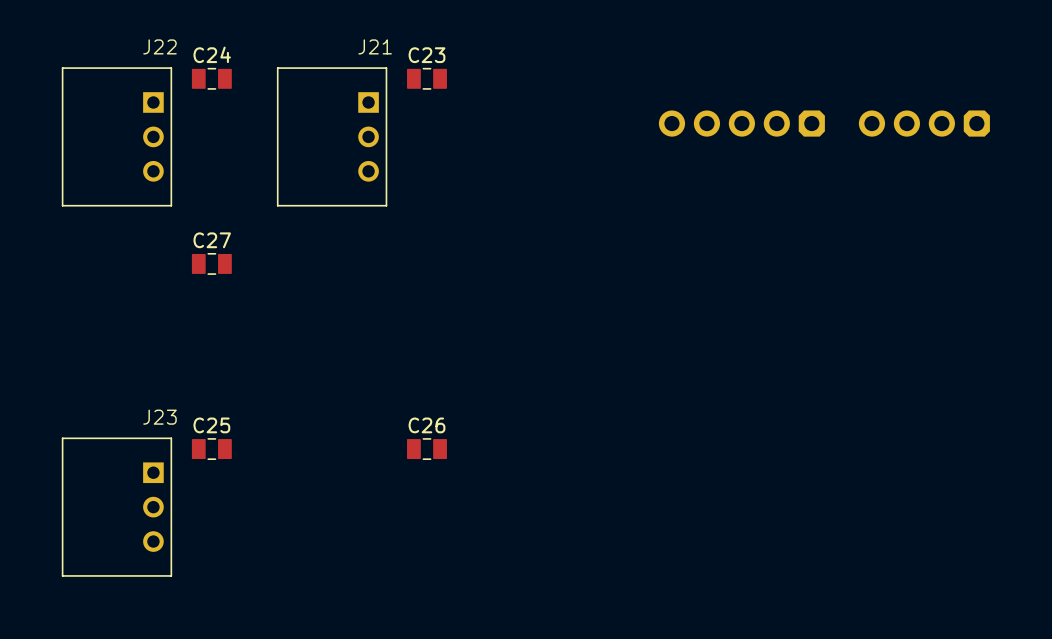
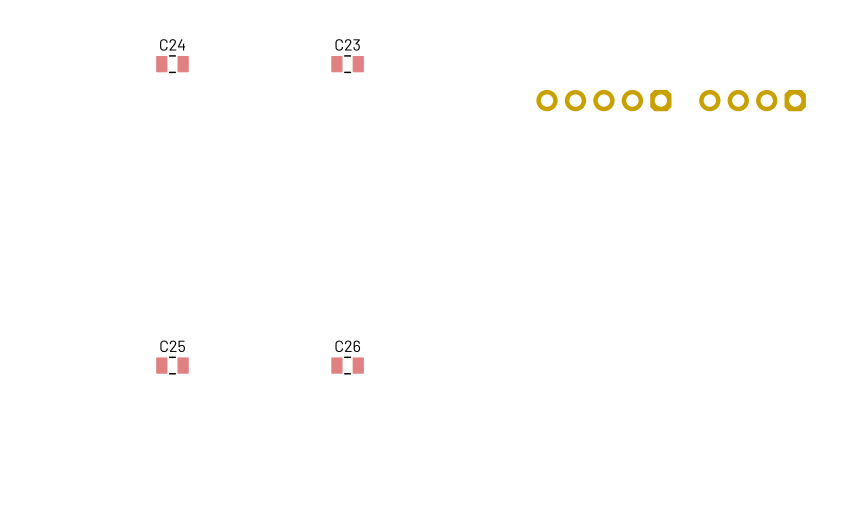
J22: (116, 136) -> none
J21: (332, 136) -> none
C27: (211, 263) -> none
J23: (116, 507) -> none

